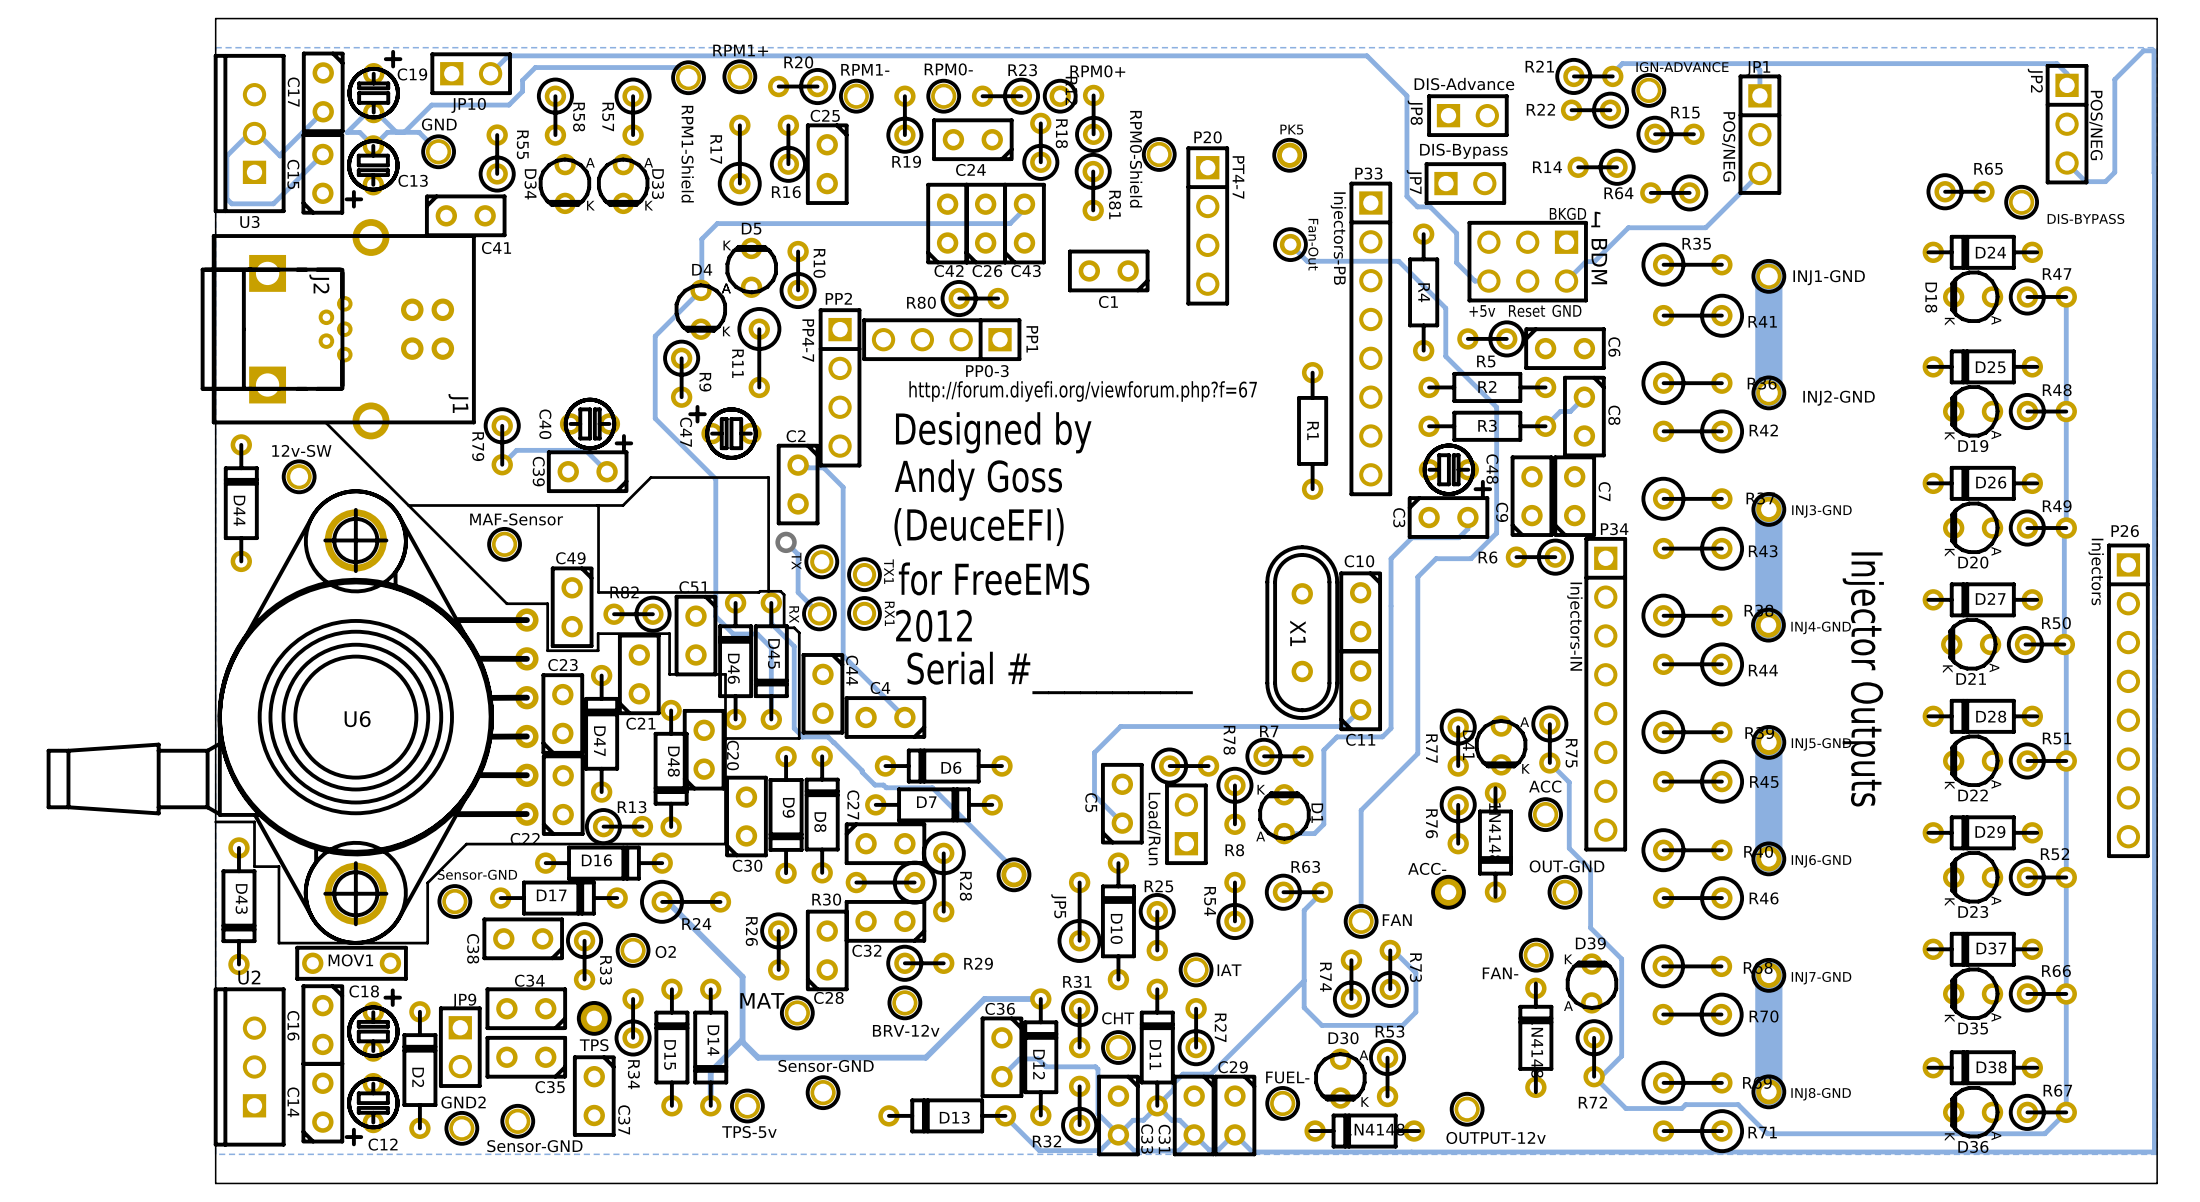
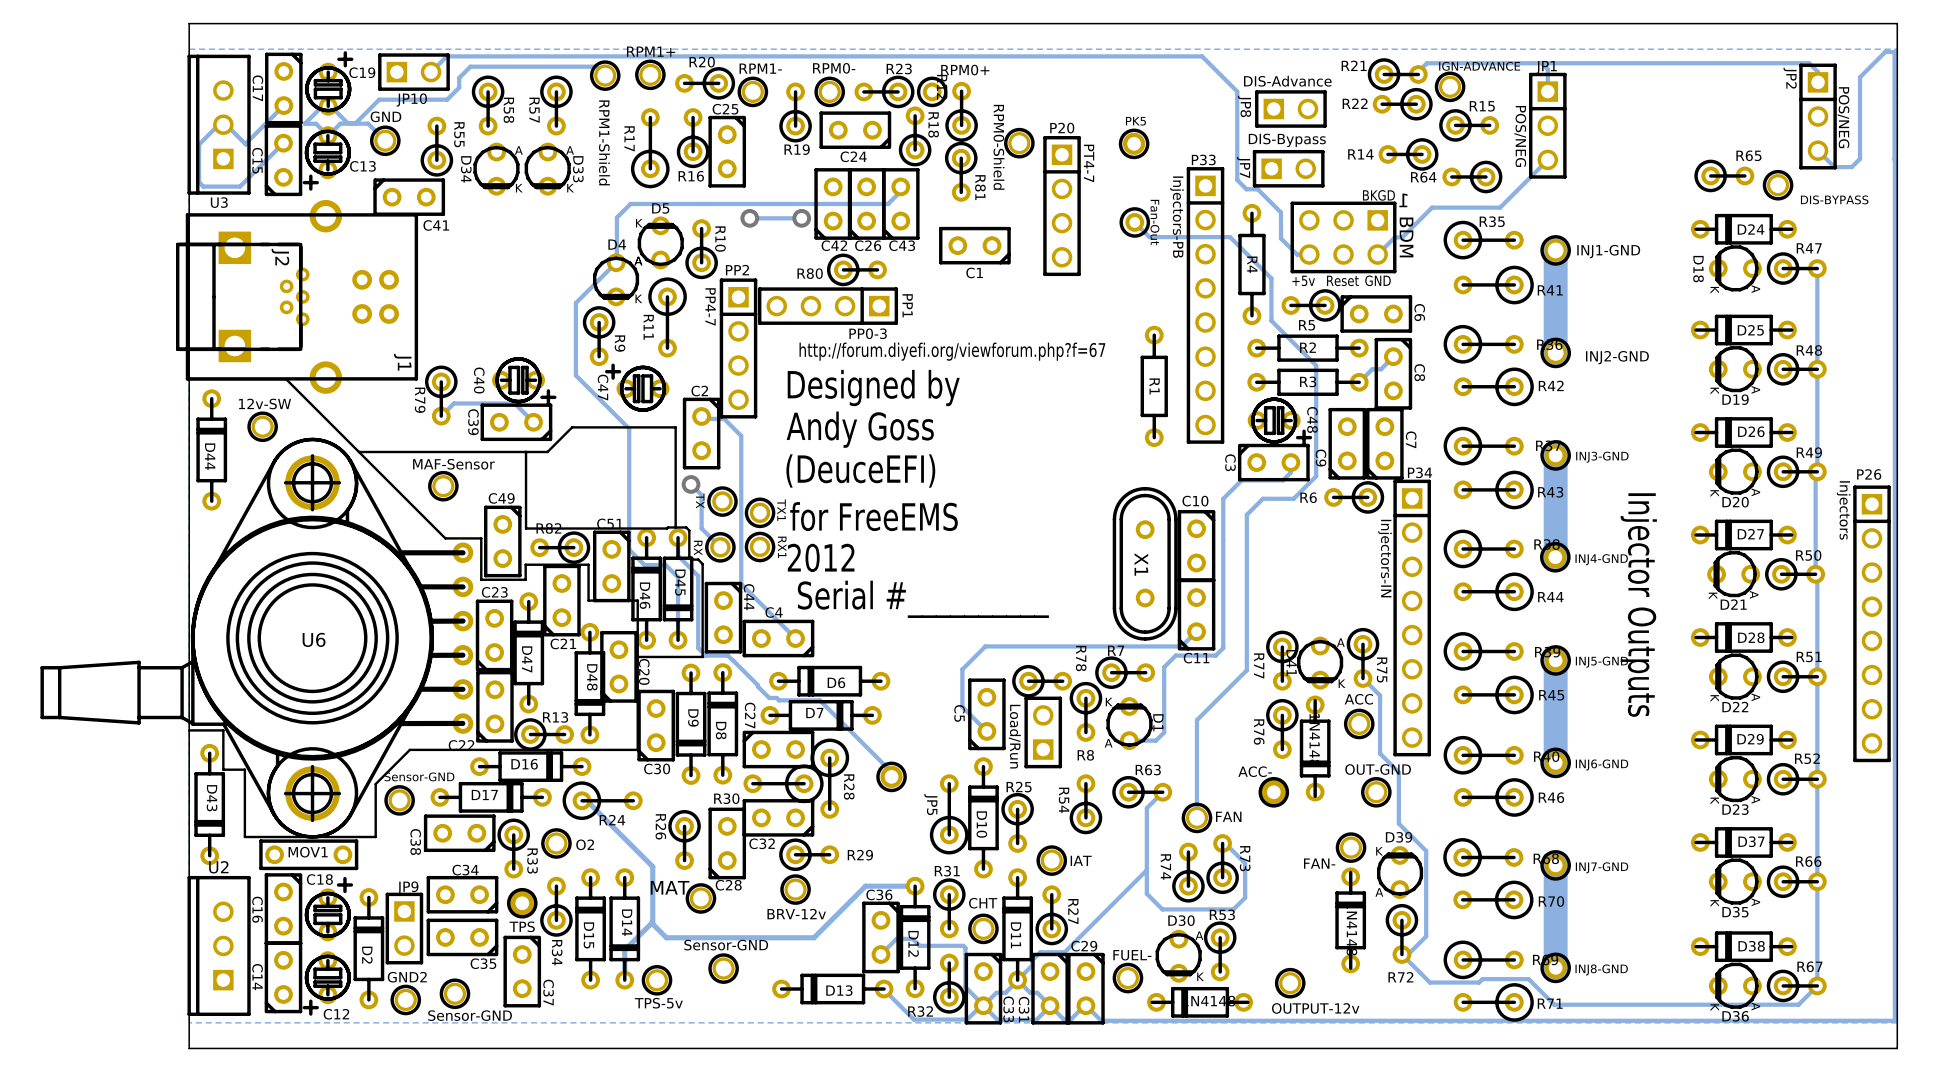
via: none -> (749, 218)
track: none -> (801, 218) (749, 218)
via: none -> (801, 218)

